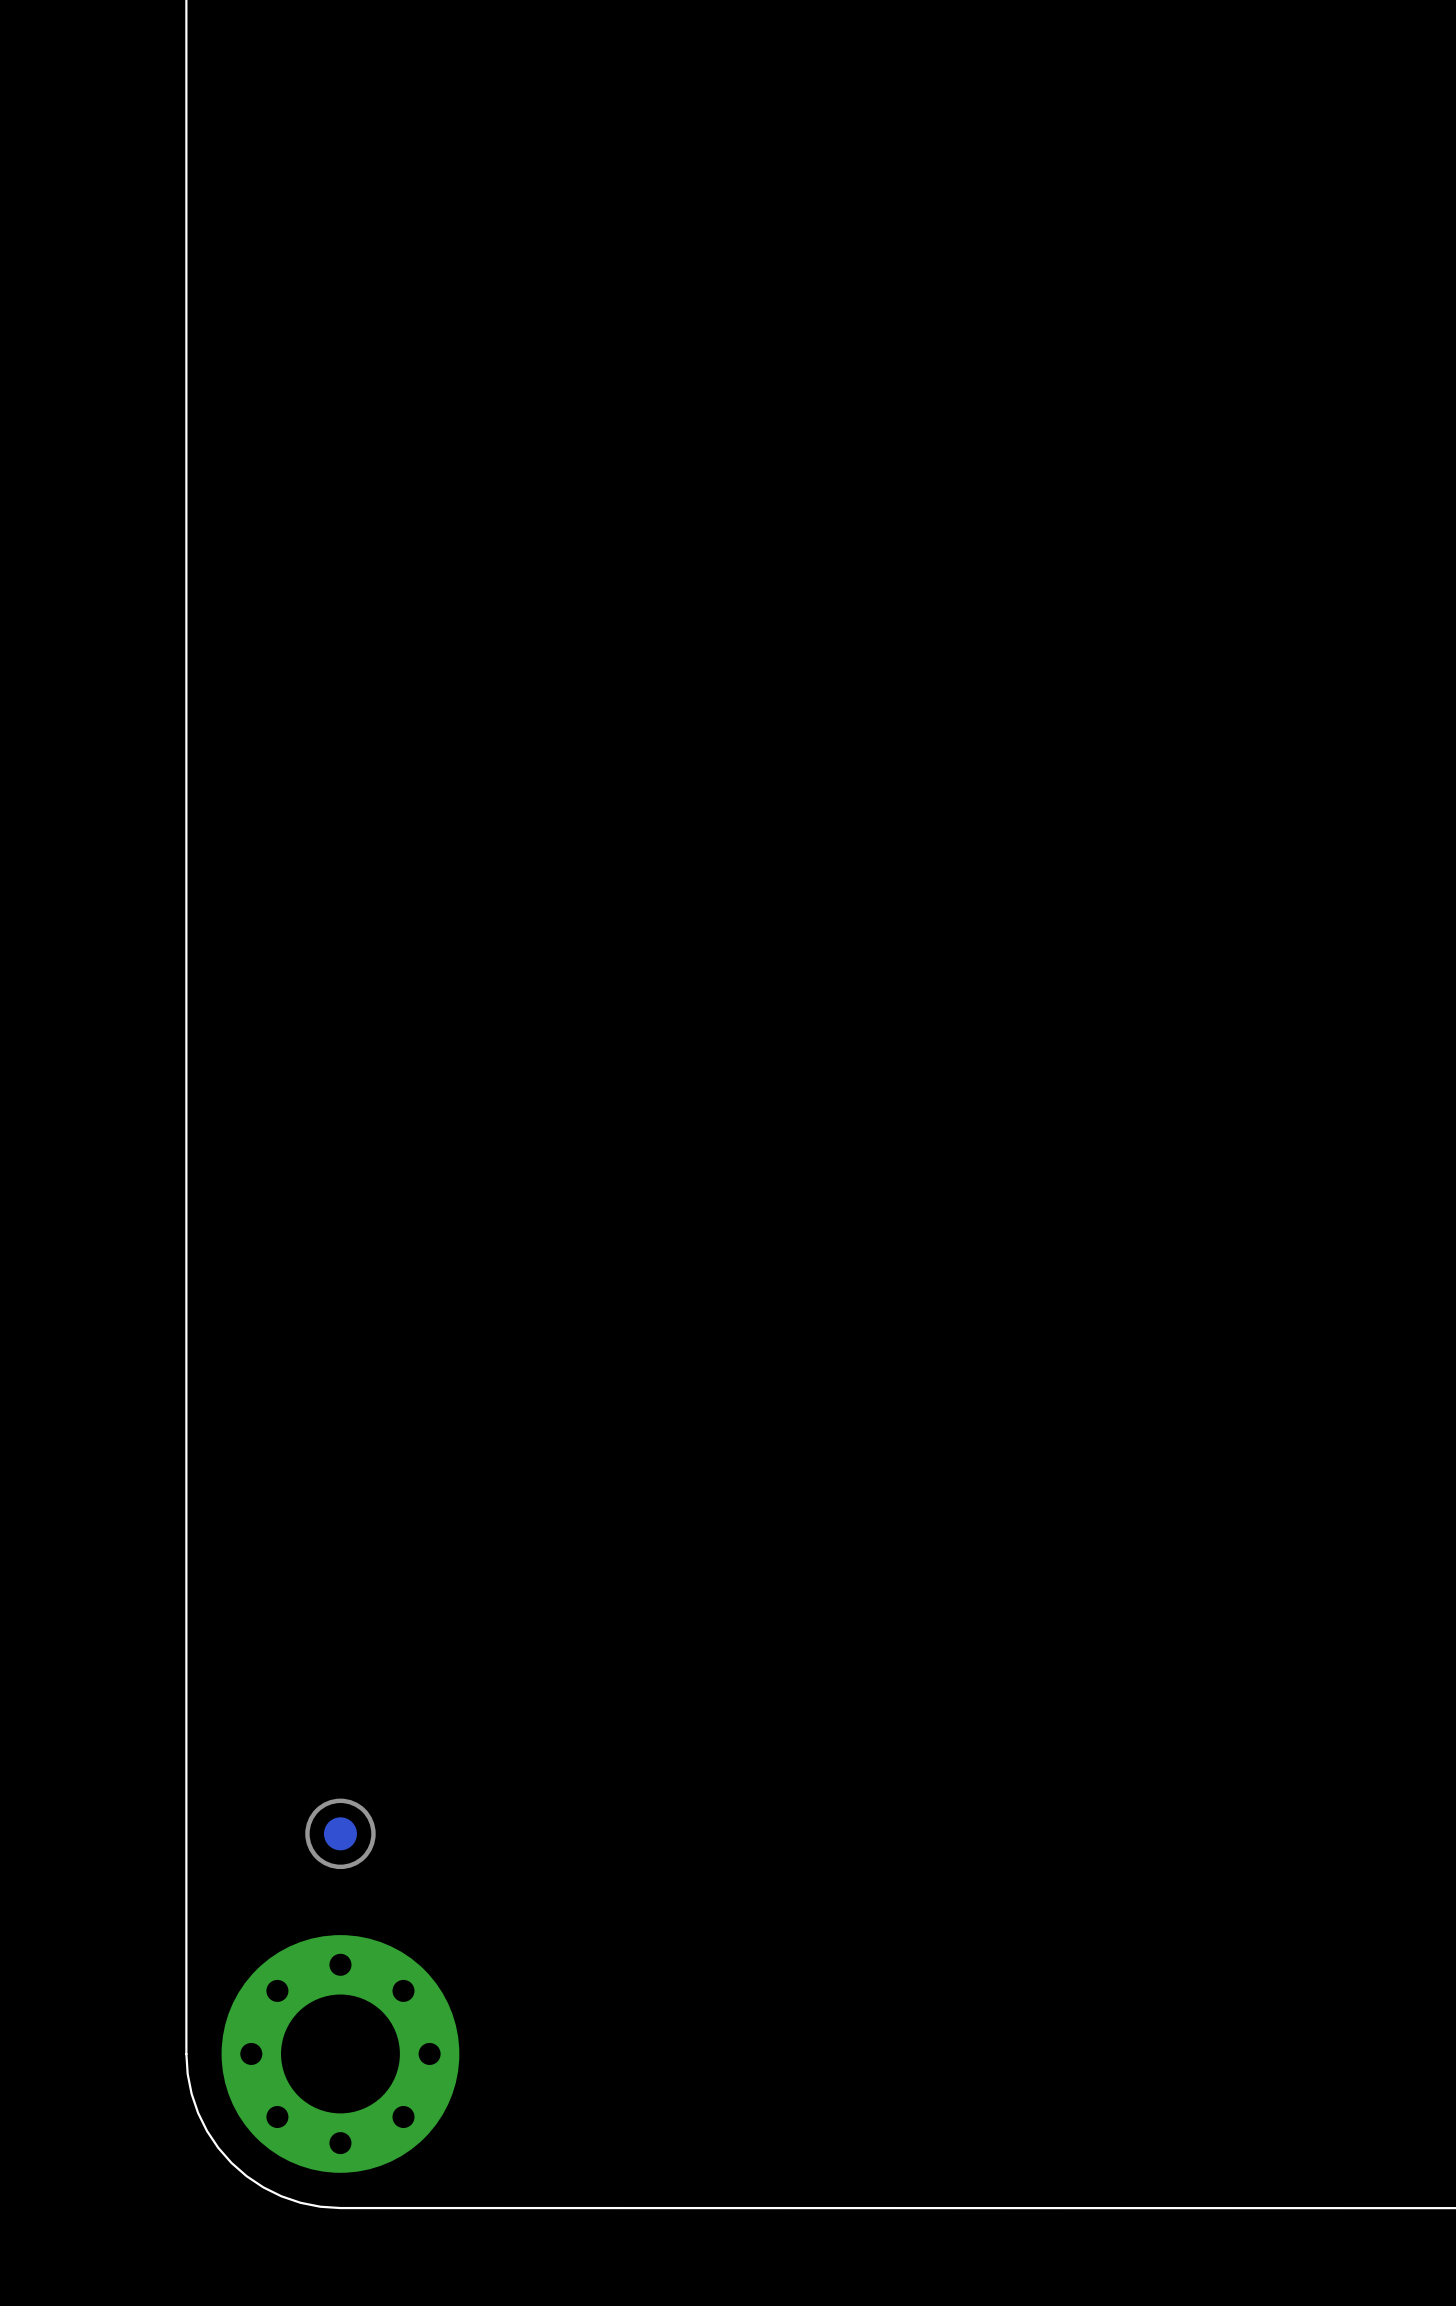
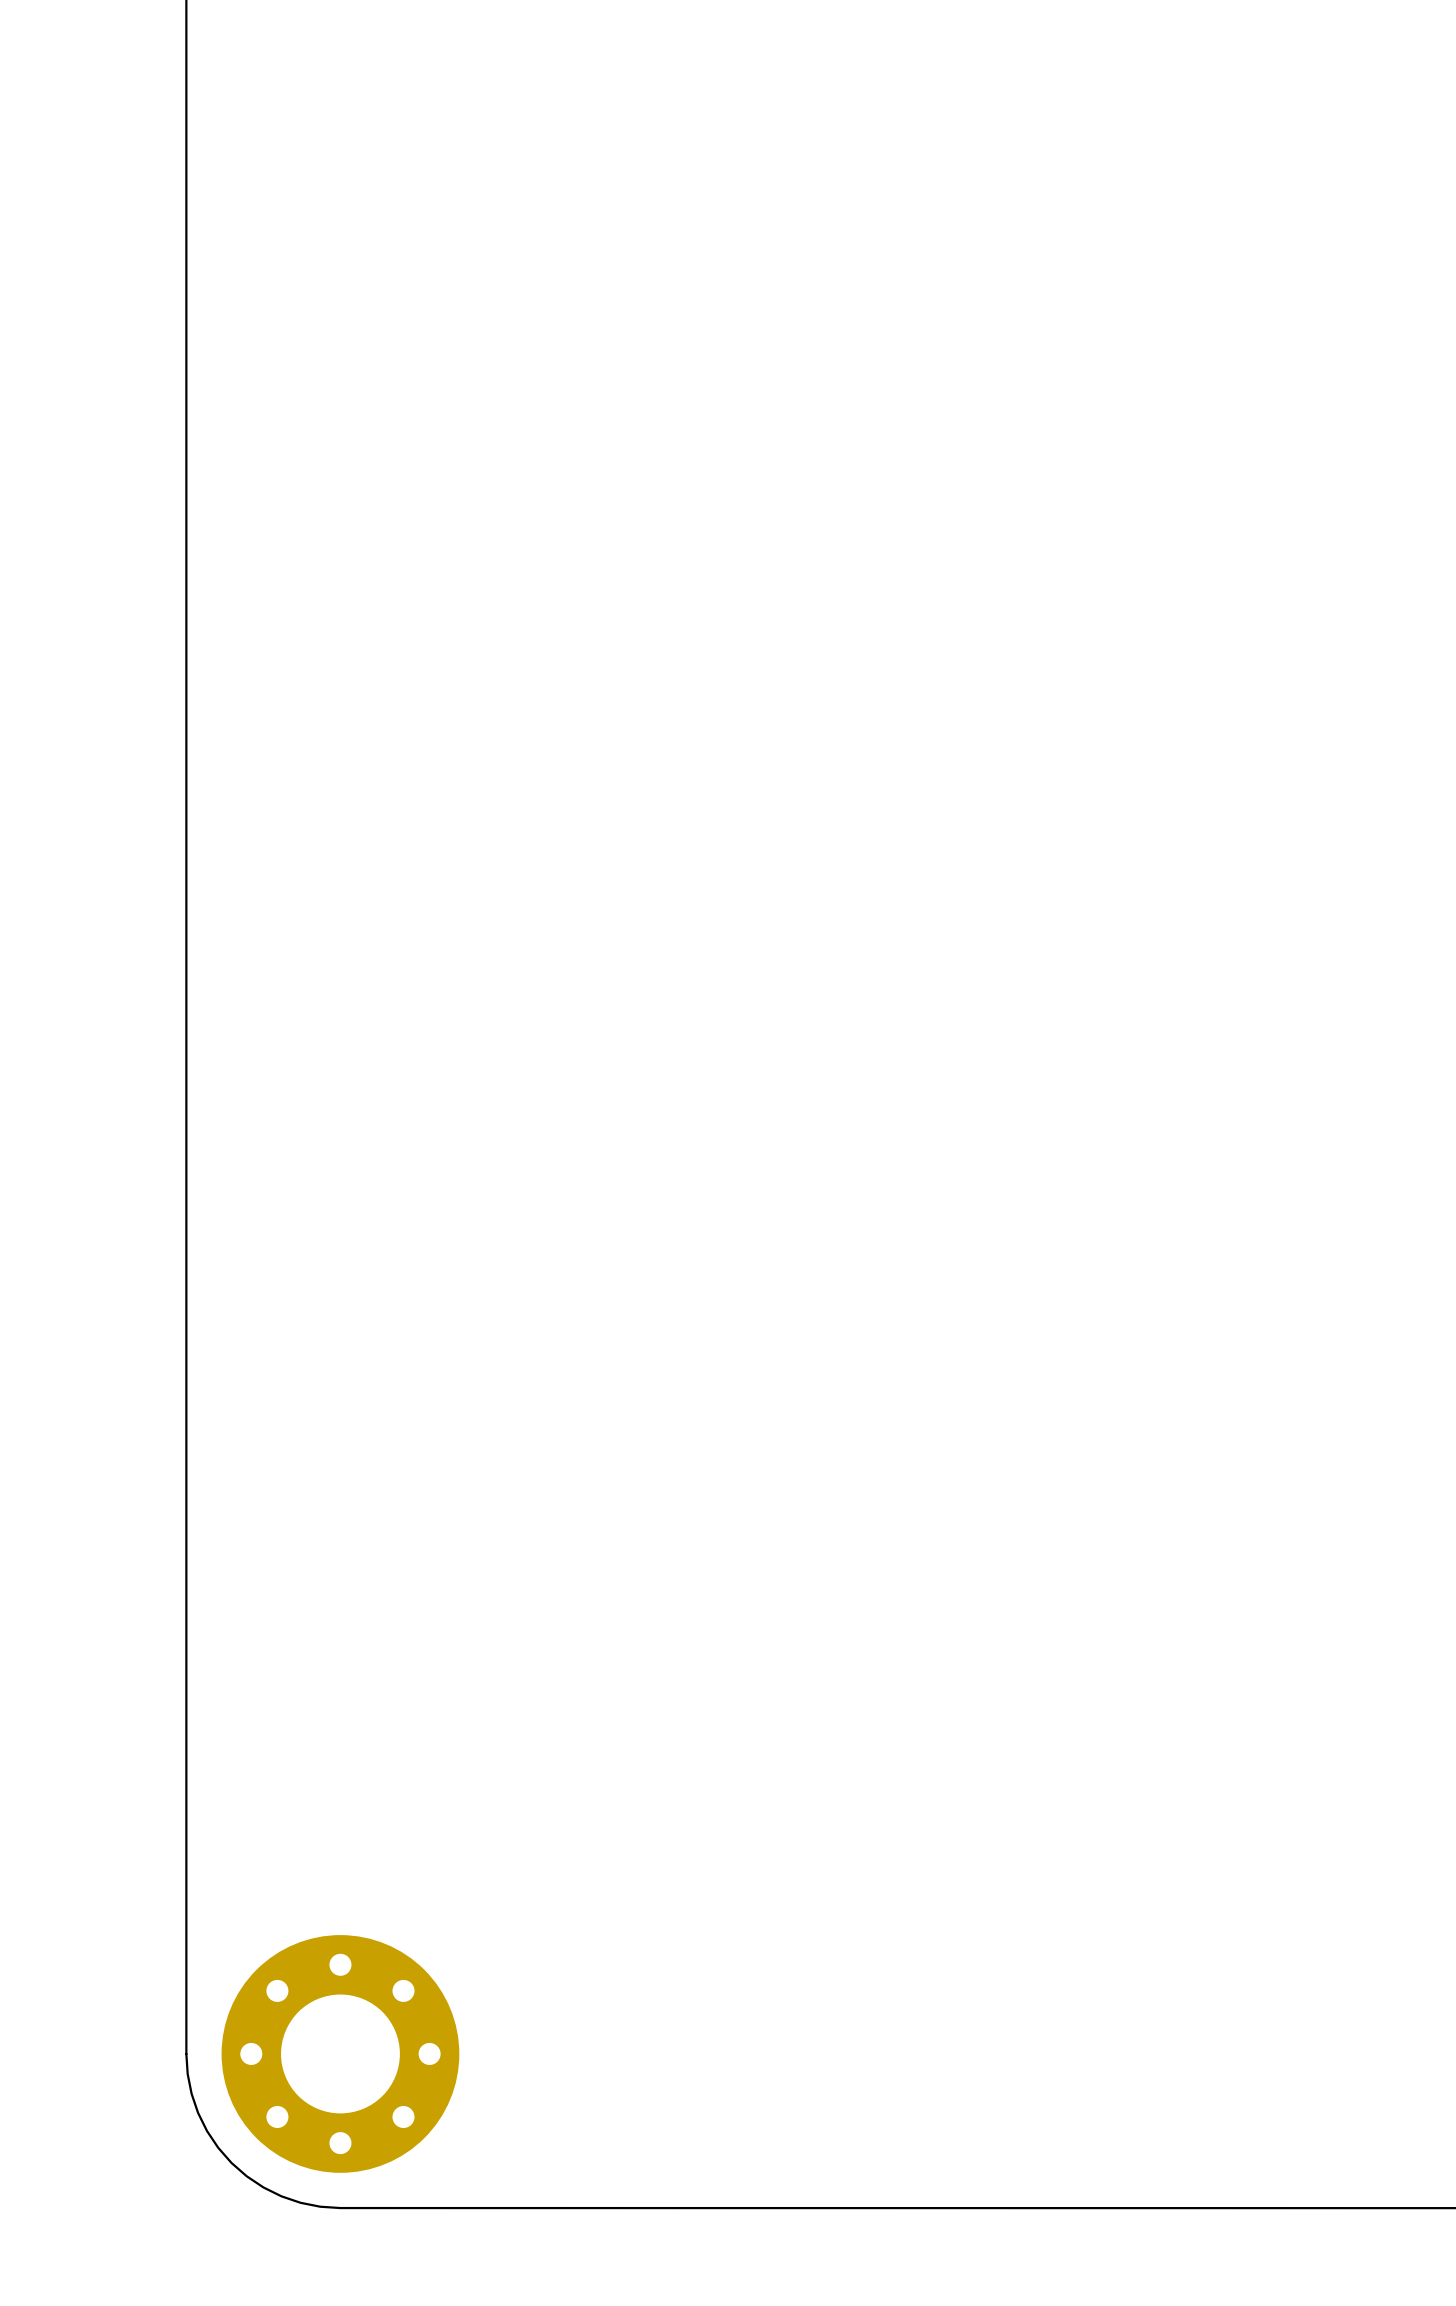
part: (340, 1833) -> none

